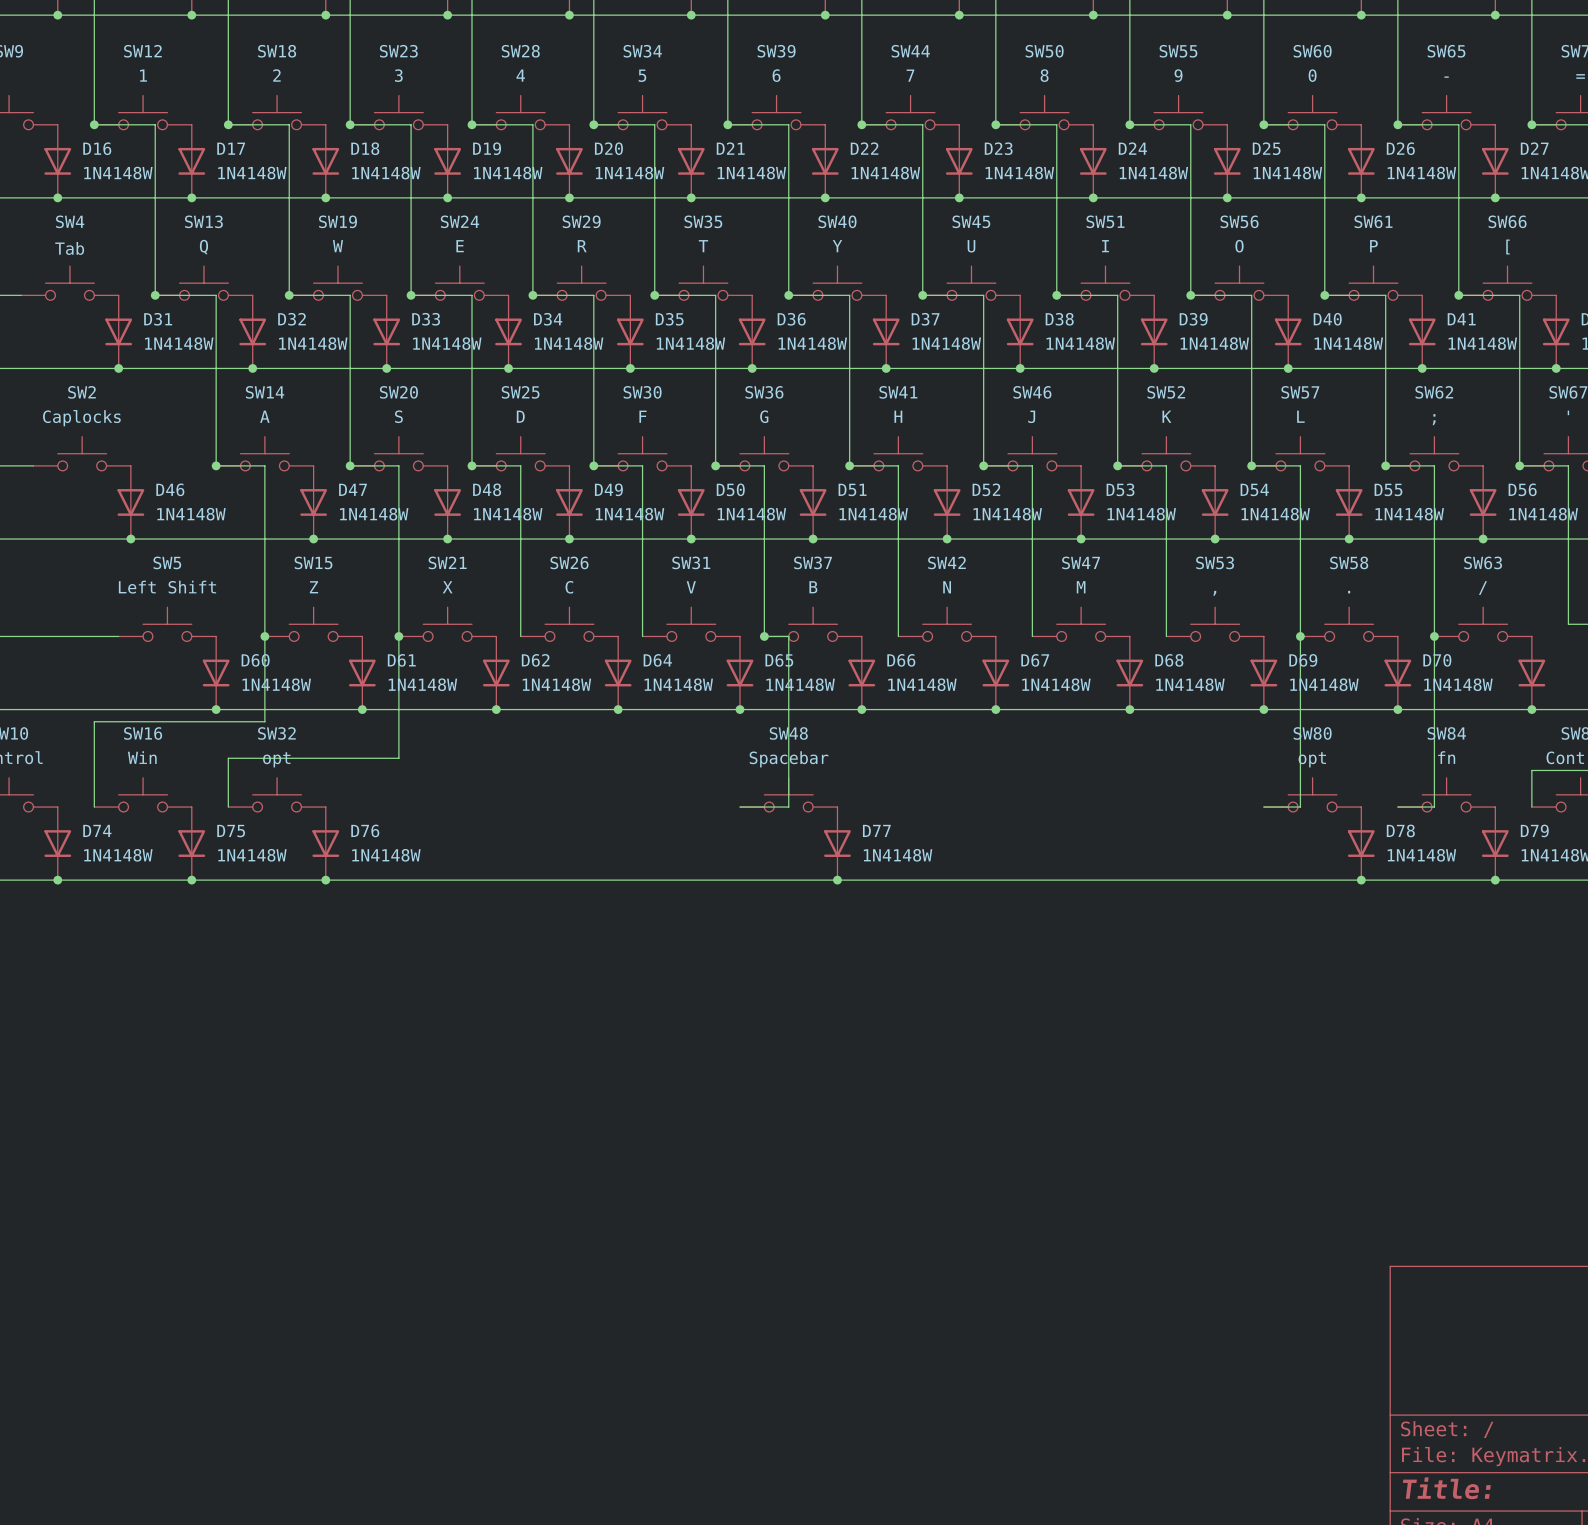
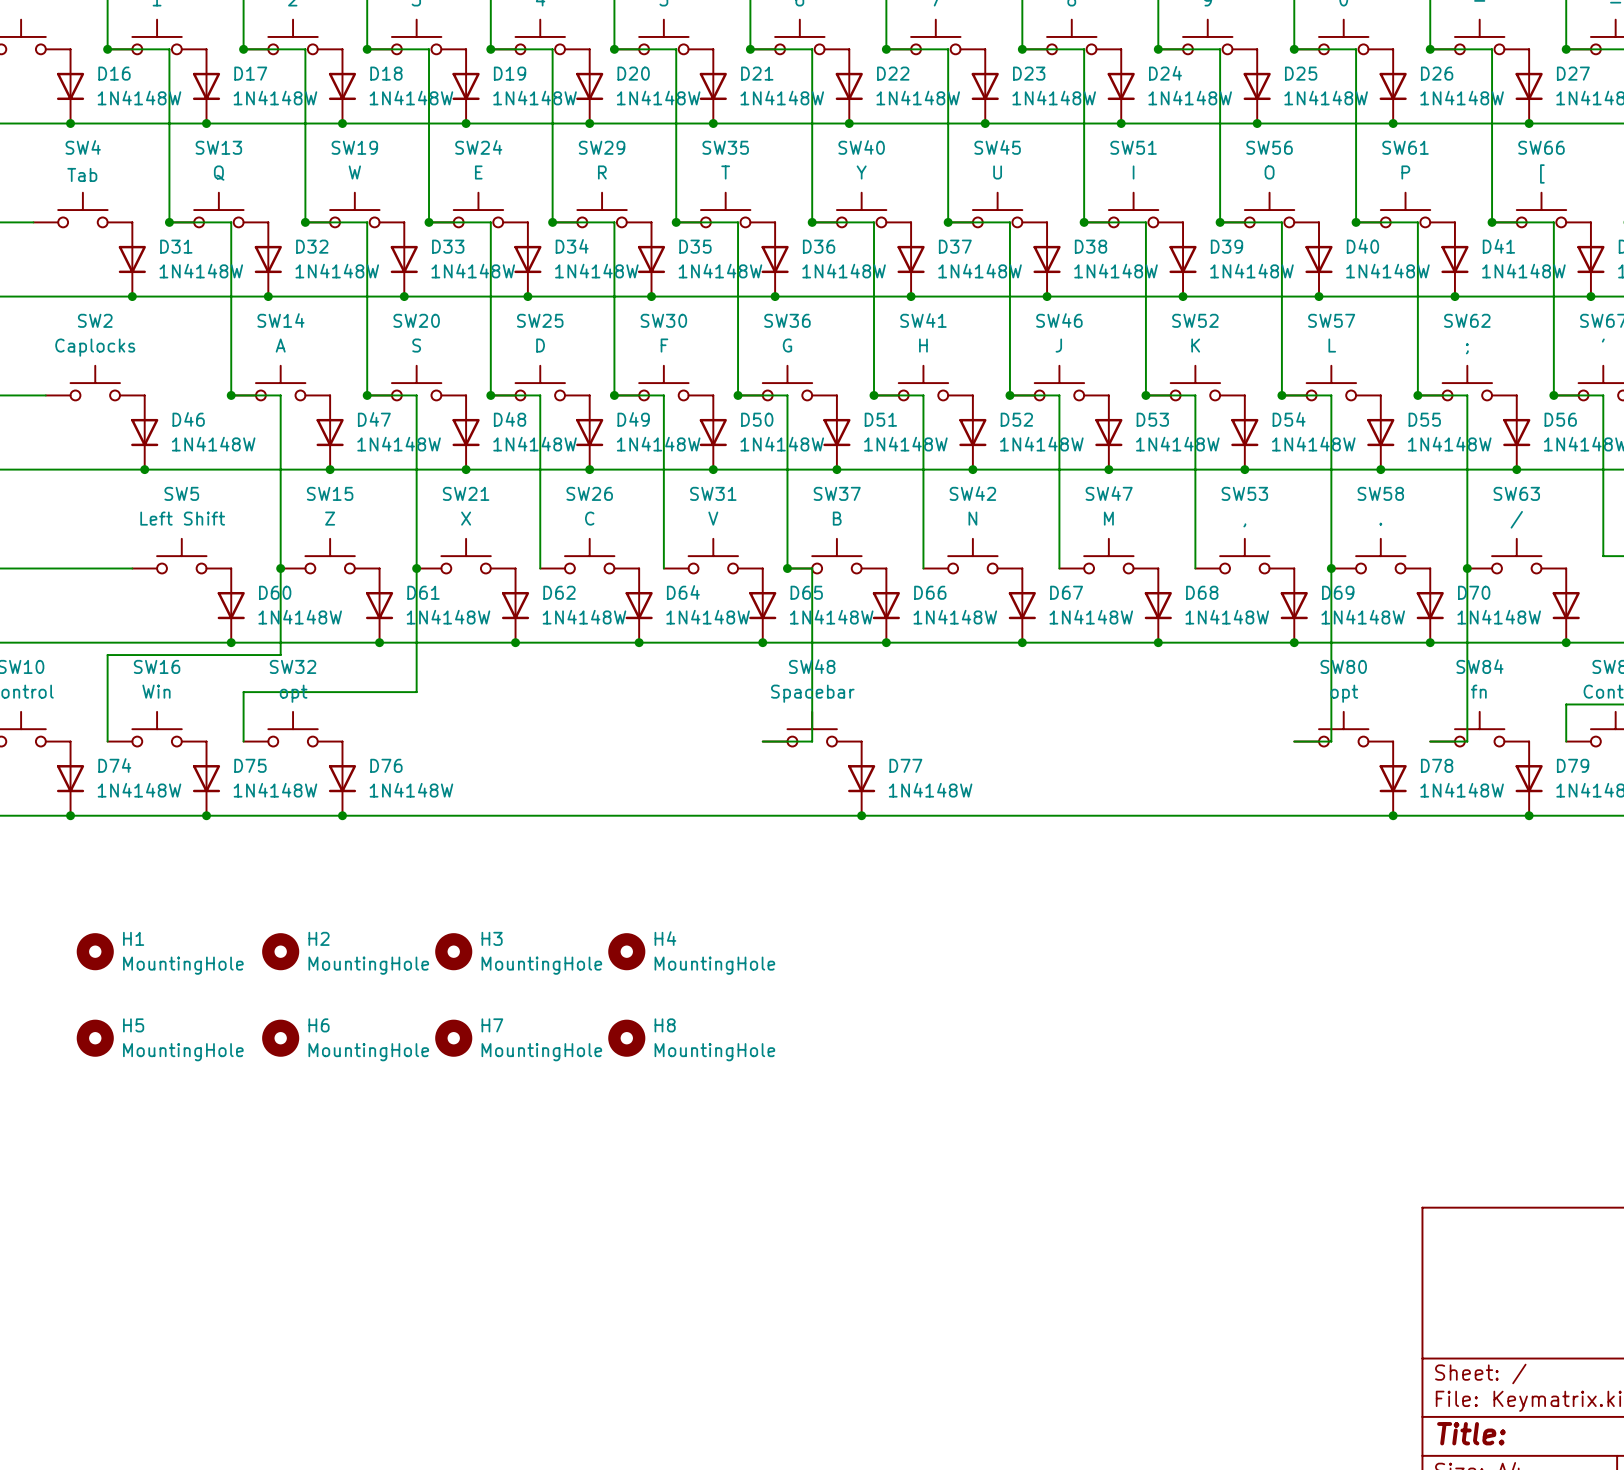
H1: none -> MountingHole (95, 951)
H2: none -> MountingHole (280, 951)
H3: none -> MountingHole (453, 951)
H4: none -> MountingHole (626, 951)
H5: none -> MountingHole (95, 1038)
H6: none -> MountingHole (280, 1038)
H7: none -> MountingHole (453, 1038)
H8: none -> MountingHole (626, 1038)

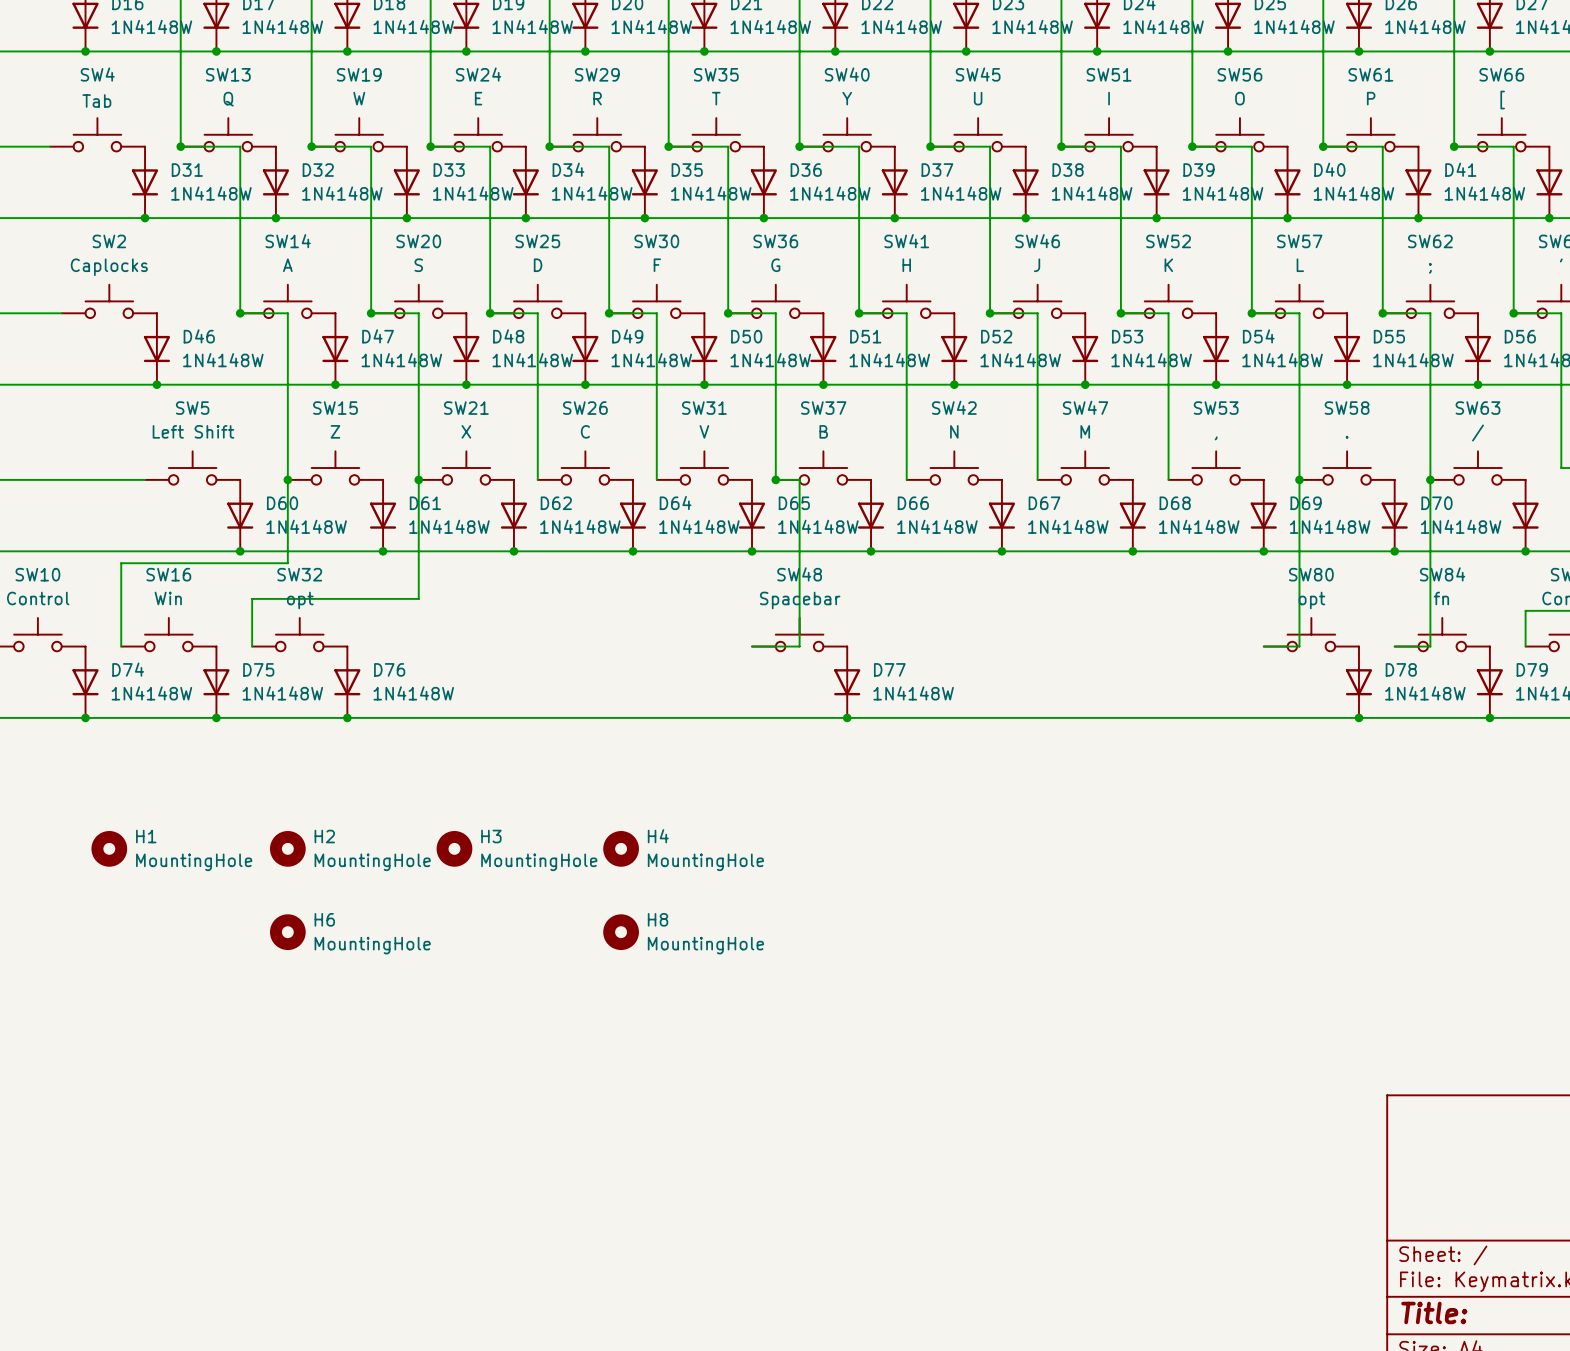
H5: MountingHole (95, 1038) -> none
H7: MountingHole (453, 1038) -> none

